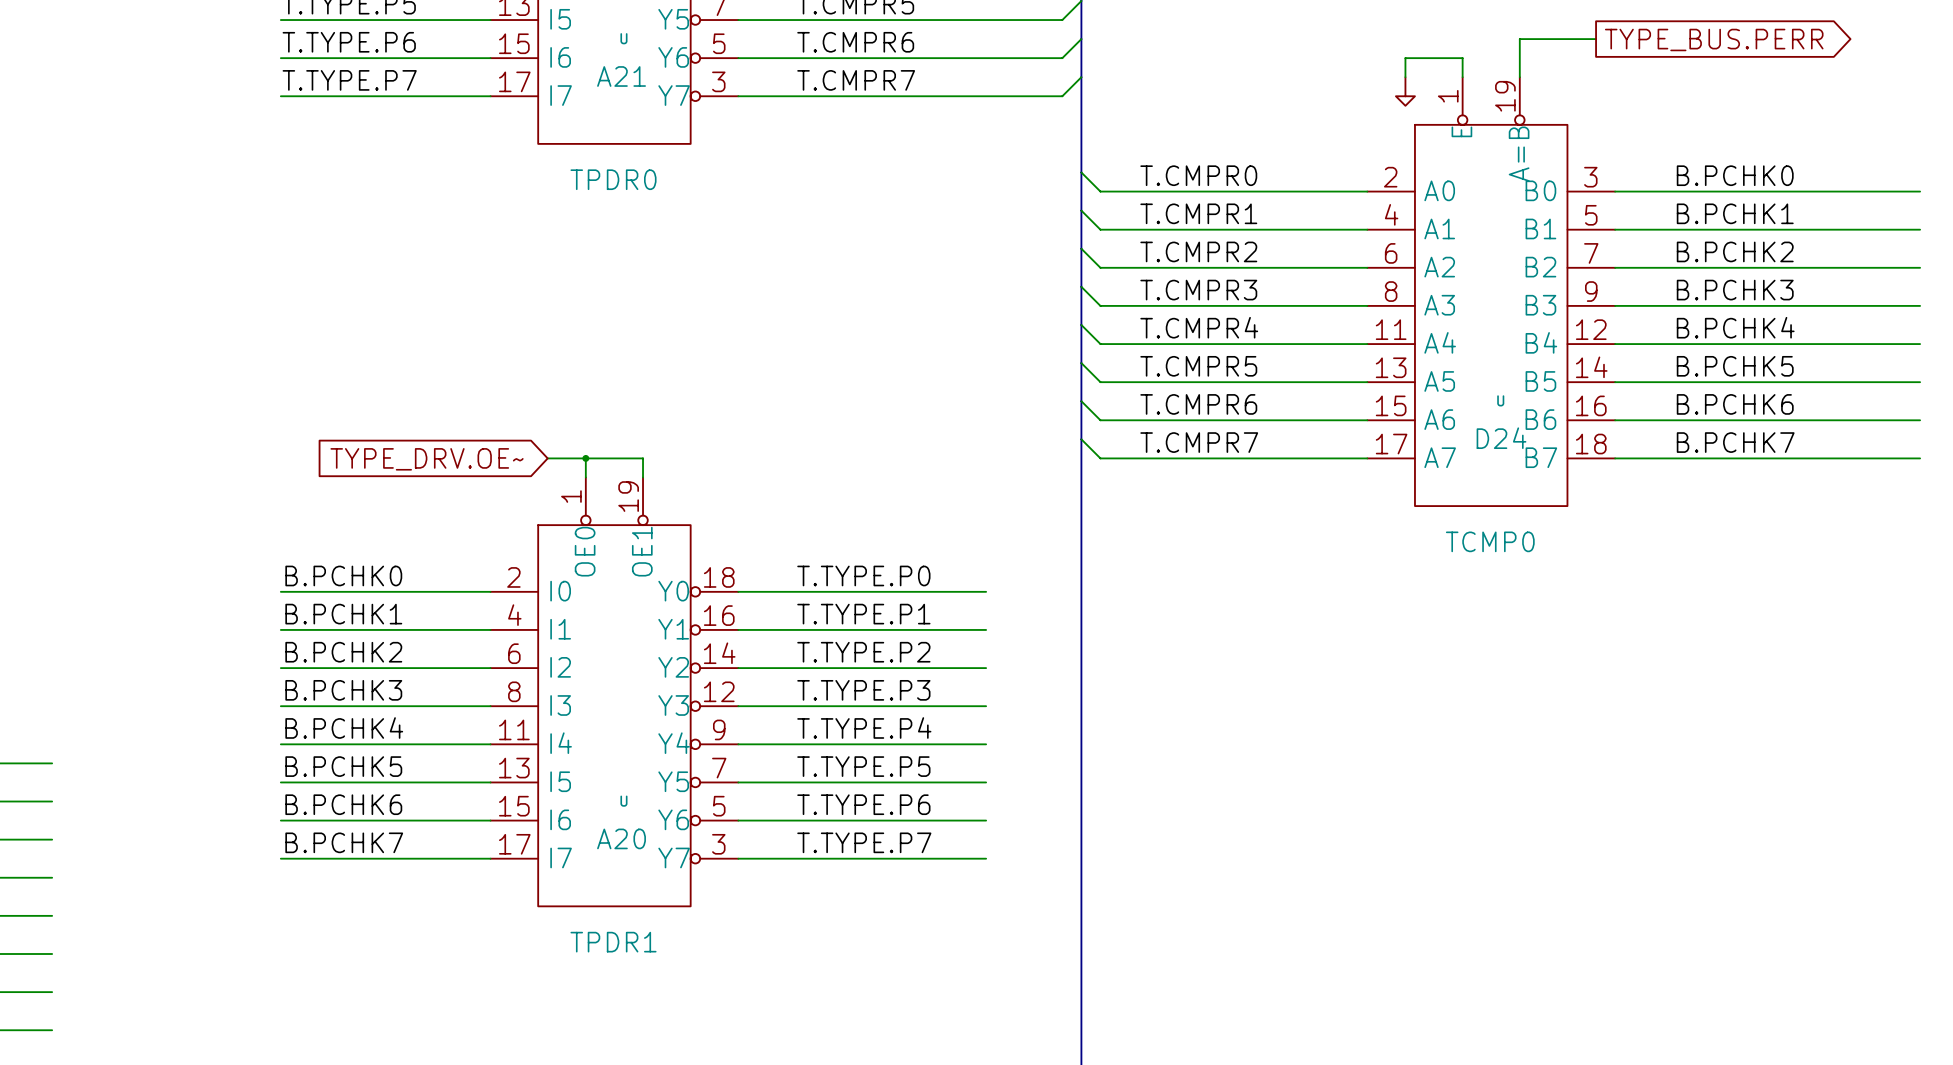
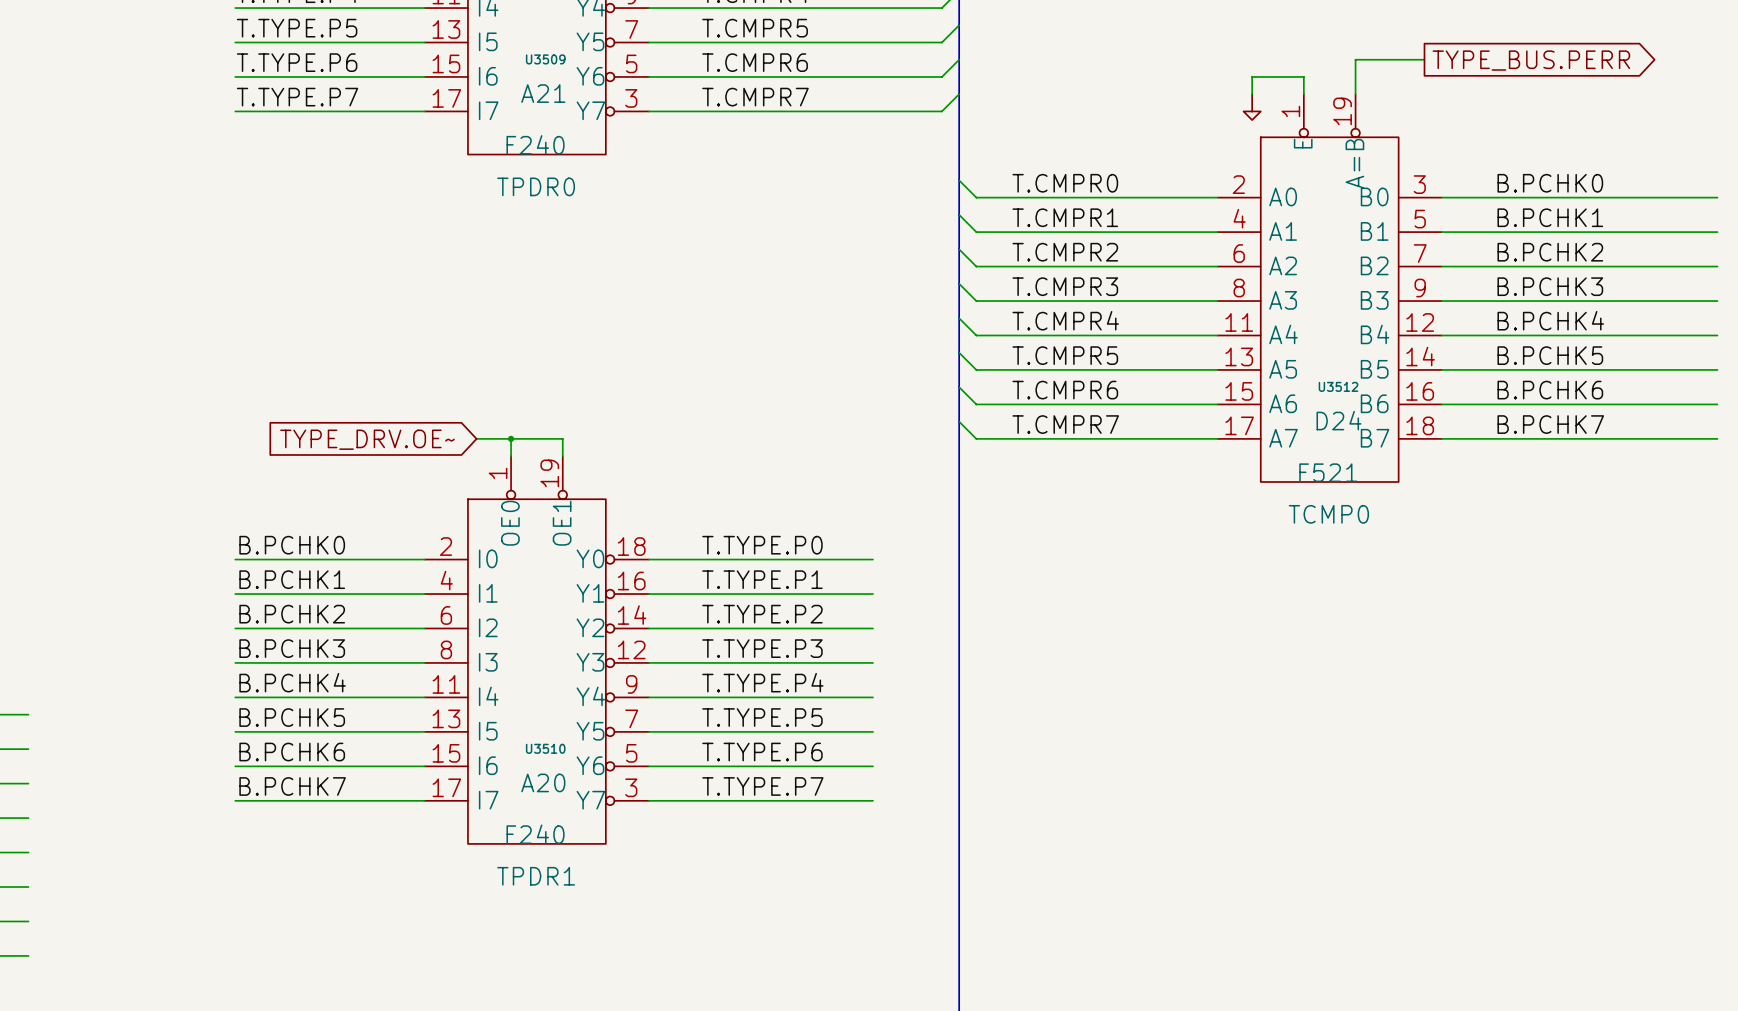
U name: U (623, 38) -> U3509 (545, 59)
U value: none -> F240 (535, 144)
U name: U (1500, 400) -> U3512 (1338, 386)
U value: none -> F521 (1328, 472)
U name: U (623, 801) -> U3510 (545, 748)
U value: none -> F240 (535, 834)

